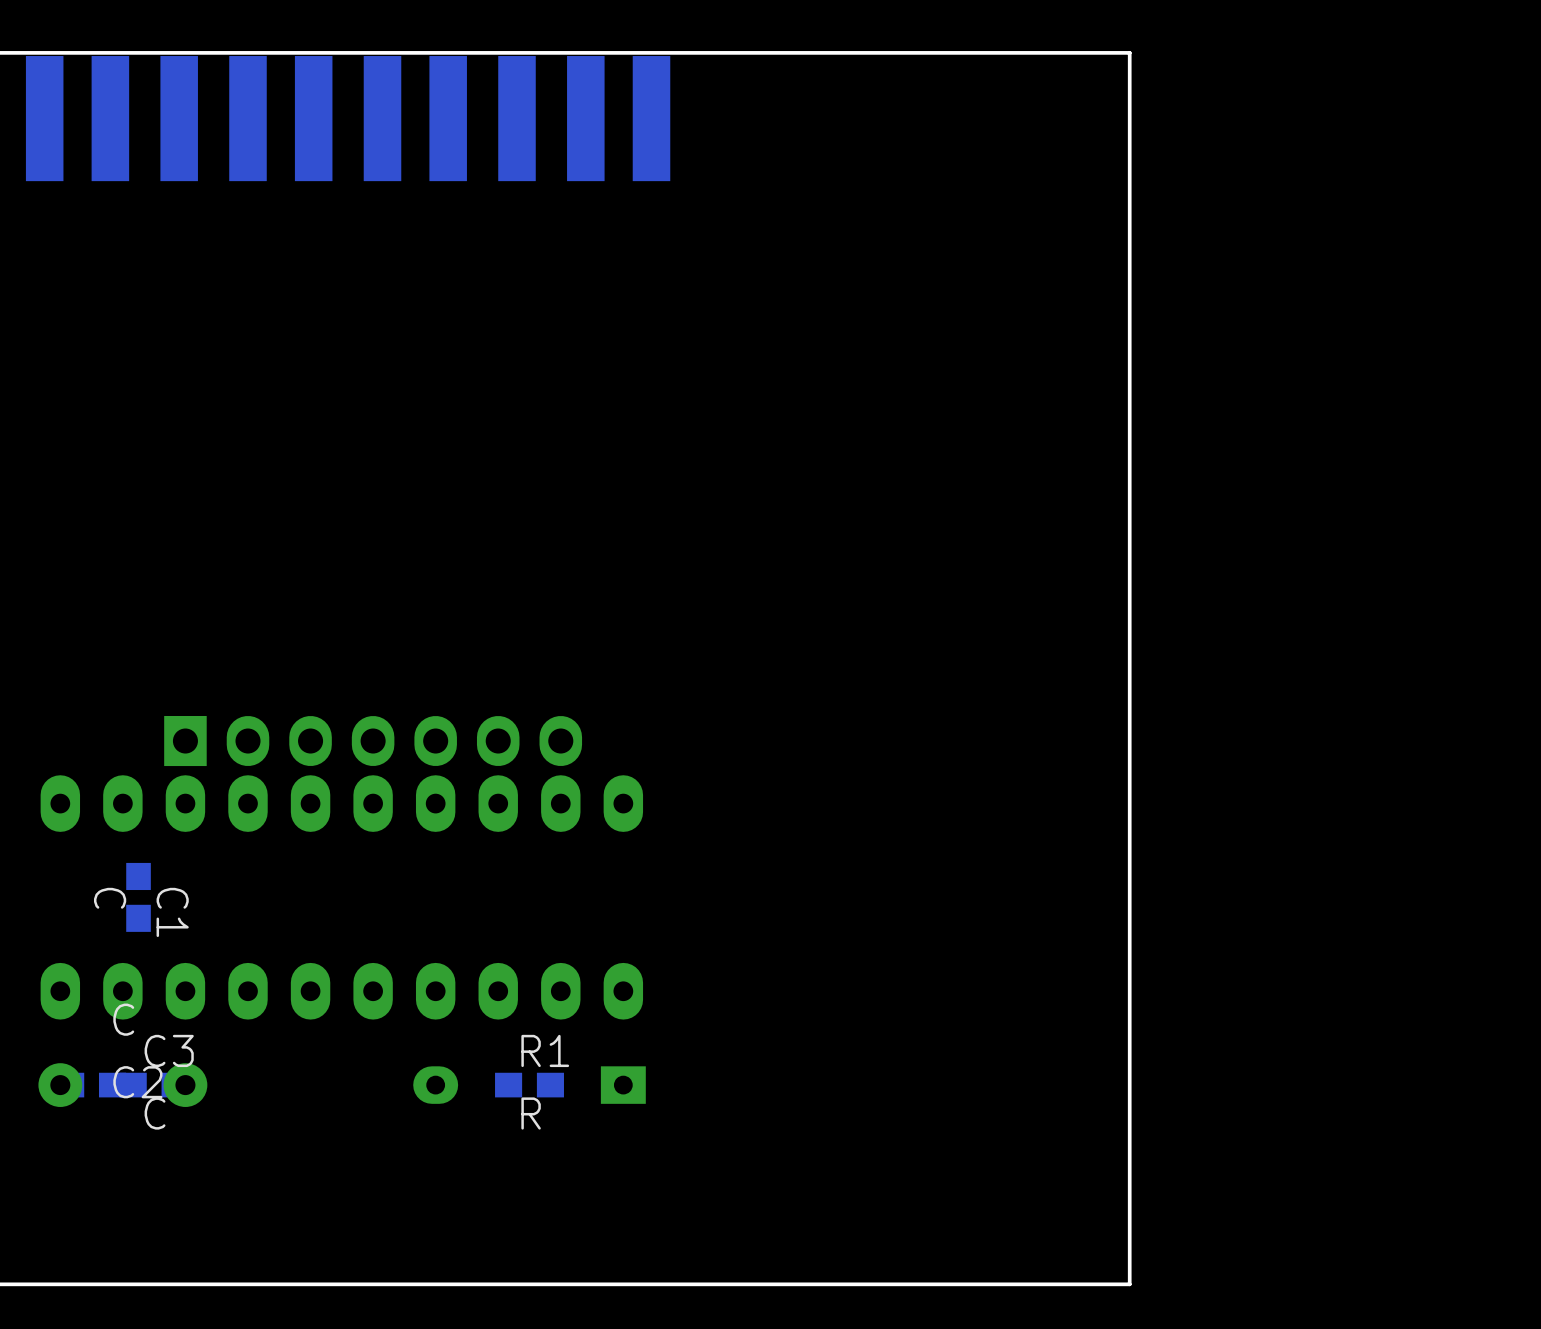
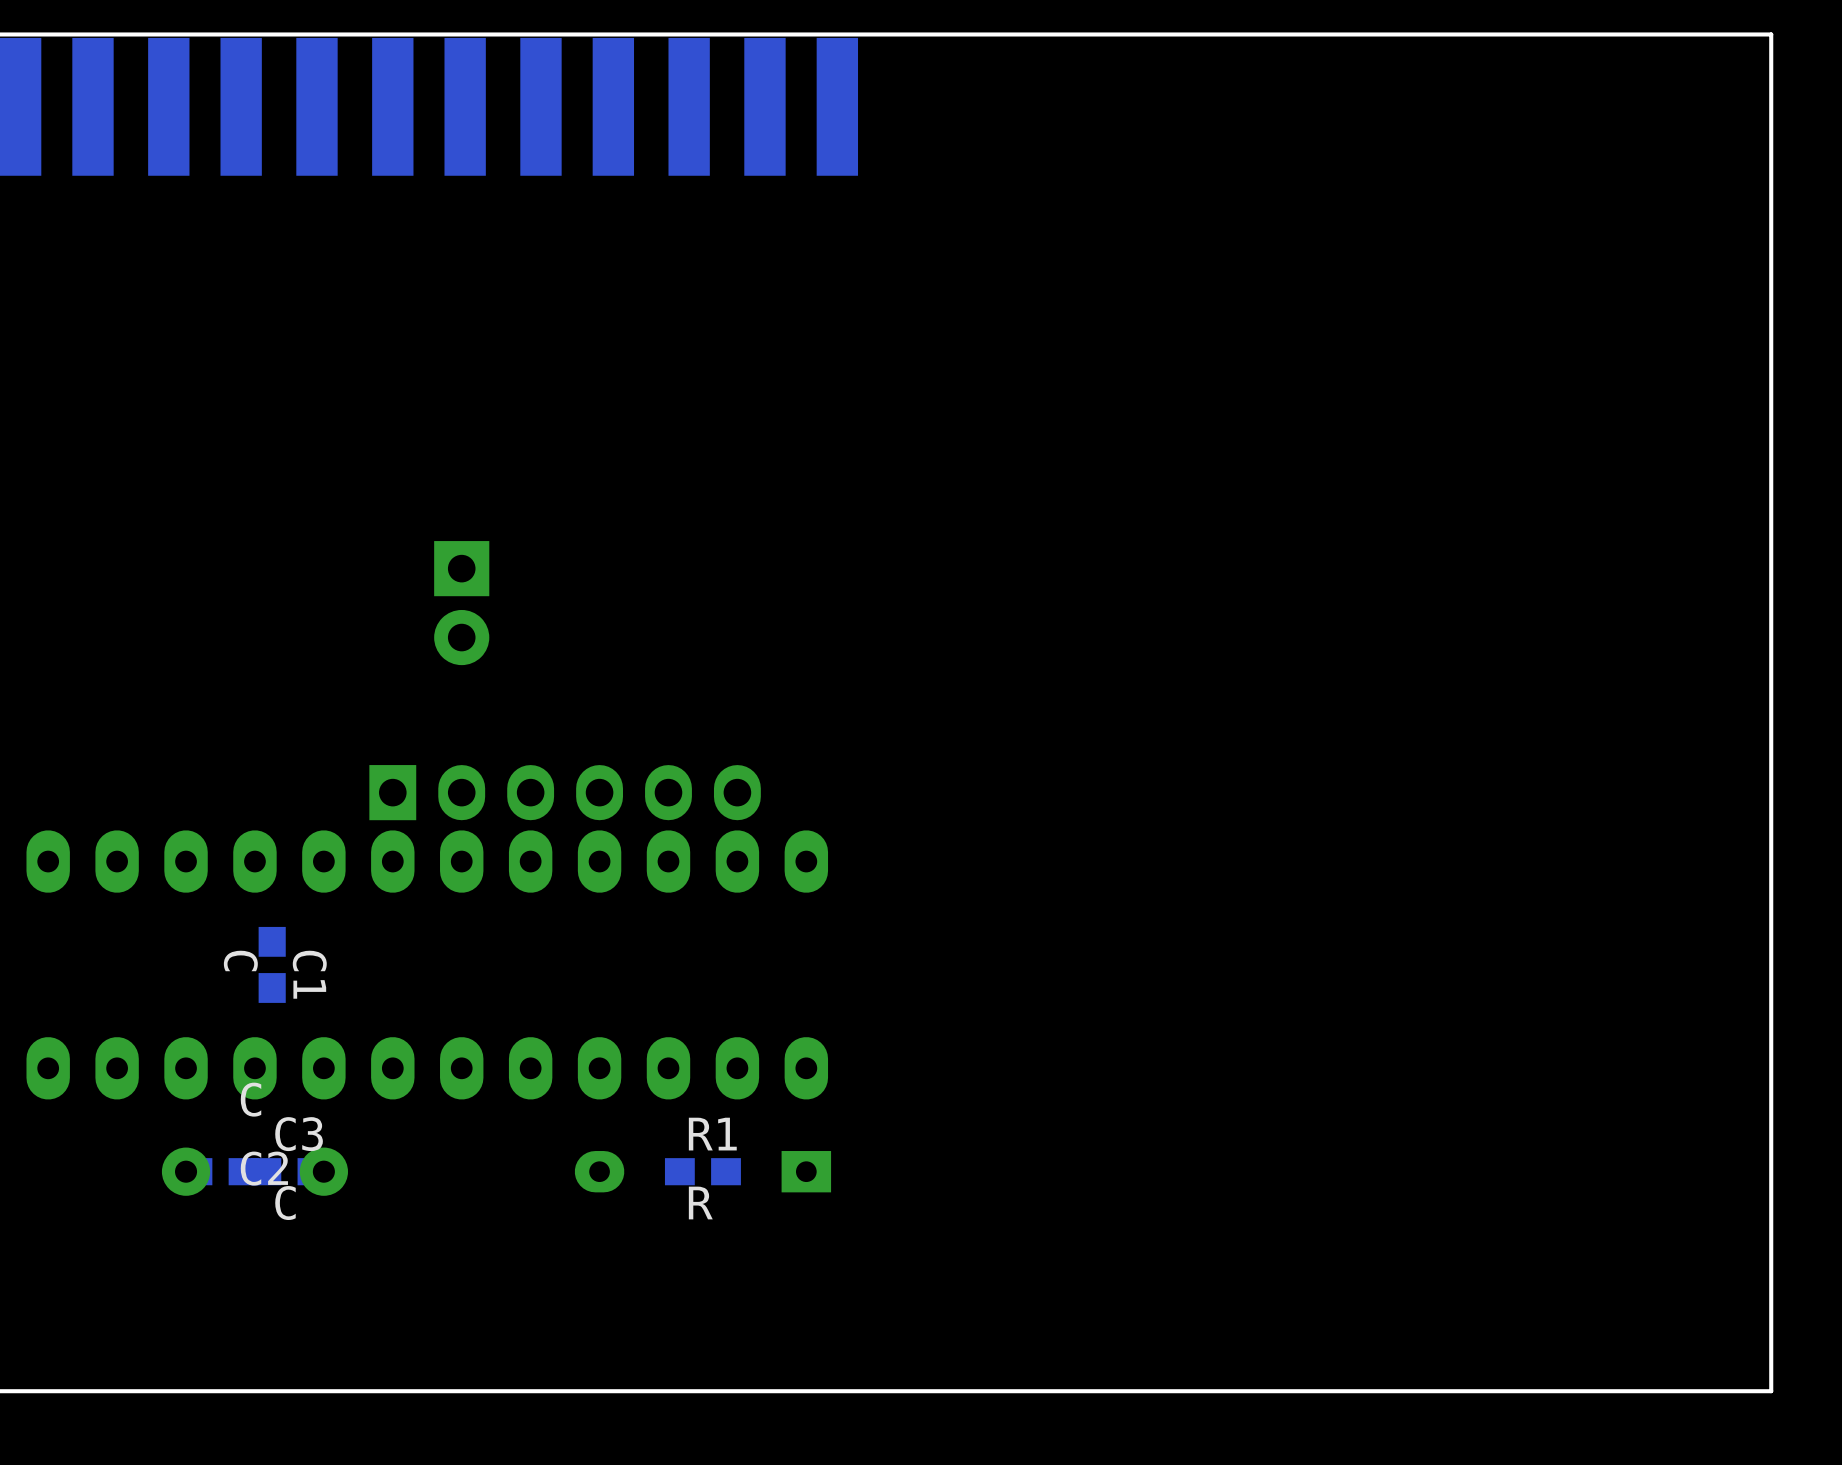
board edge: (1129, 52) (1129, 1284) -> (1364, 34) (1771, 34) (1771, 1391) (1364, 1391)
part: none -> (461, 603)
part: (373, 741) -> none
part: none -> (565, 792)

